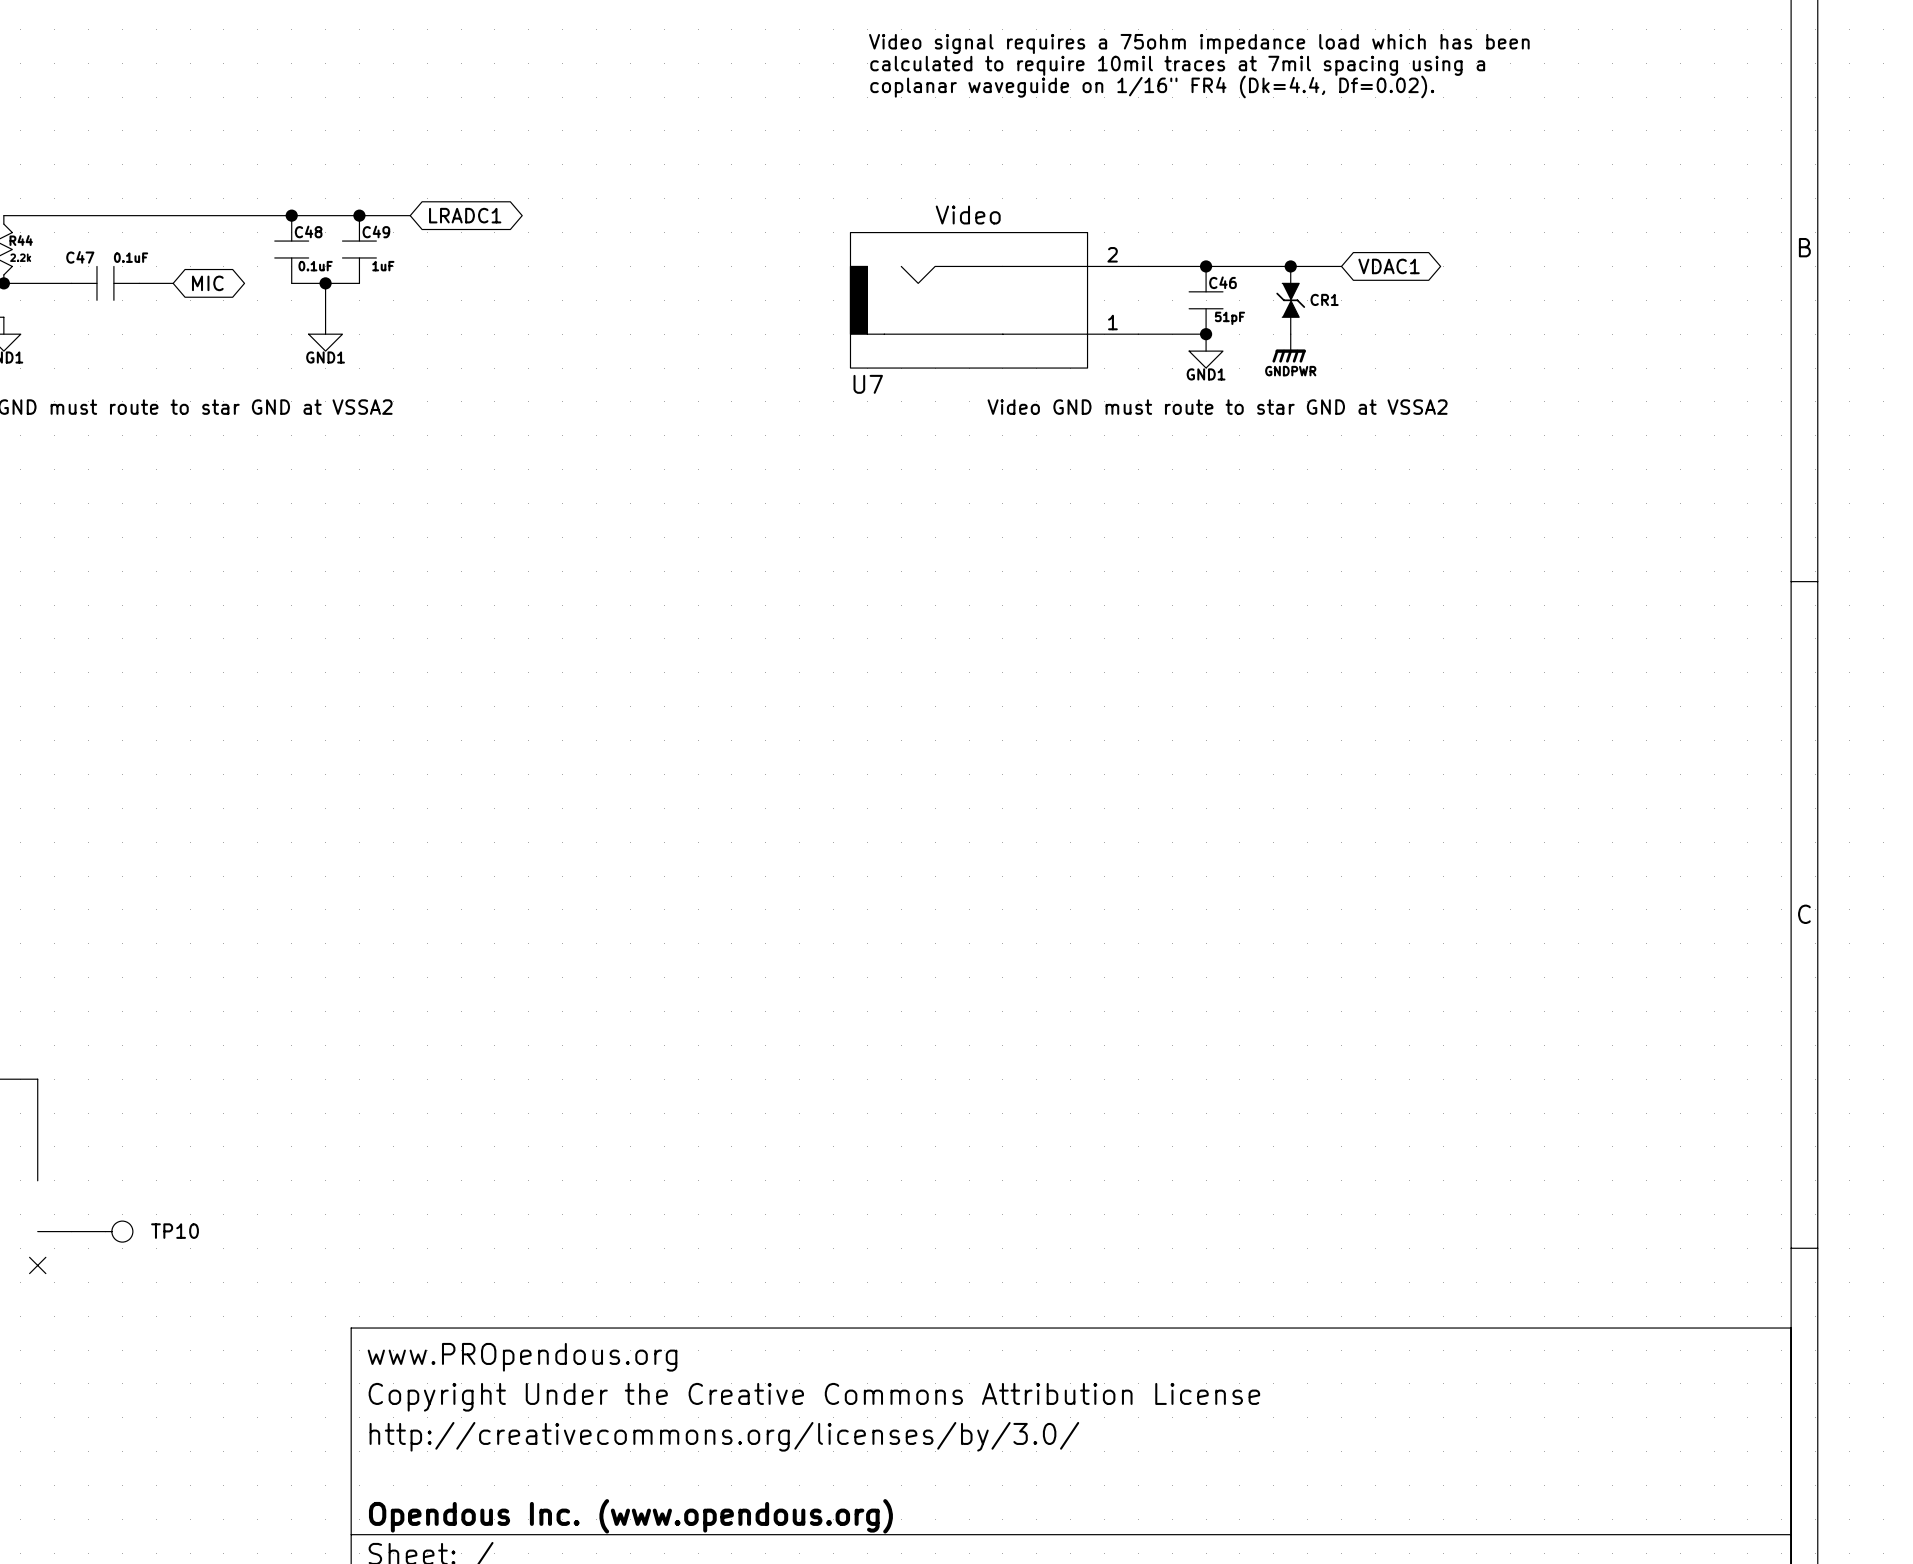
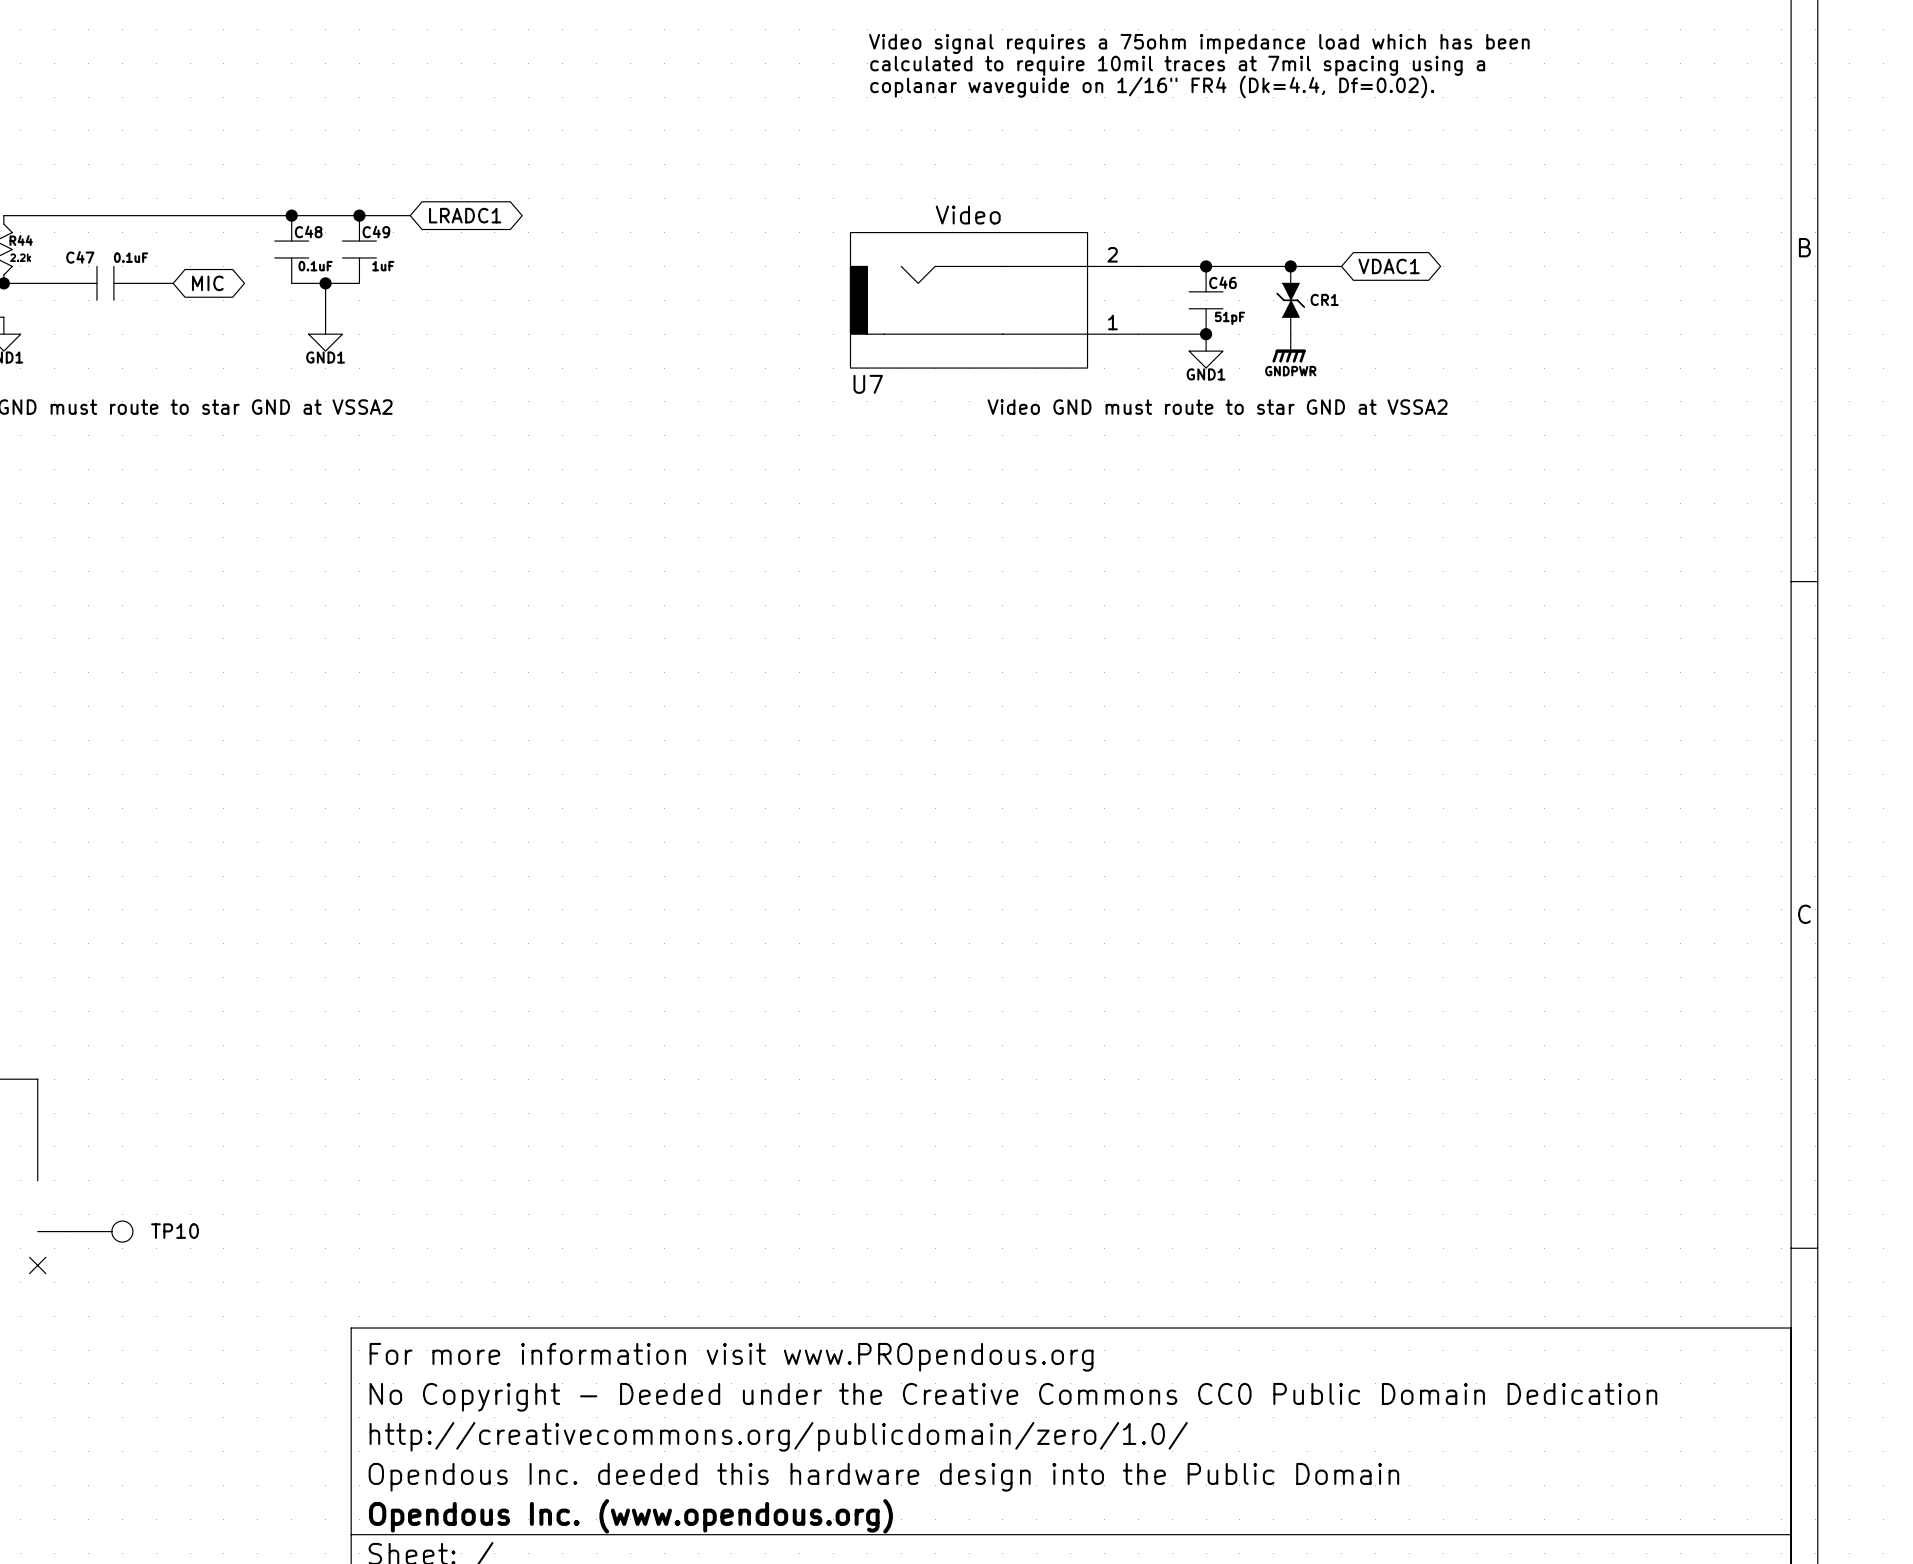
title block: www.PROpendous.org (522, 1357) -> For more information visit www.PROpendous.org (731, 1357)
title block: Copyright Under the Creative Commons Attribution License (814, 1397) -> No Copyright - Deeded under the Creative Commons CC0 Public Domain Dedication (1013, 1397)
title block: http://creativecommons.org/licenses/by/3.0/ (724, 1436) -> http://creativecommons.org/publicdomain/zero/1.0/ (778, 1436)
title block: none -> Opendous Inc. deeded this hardware design into the Public Domain (883, 1477)

